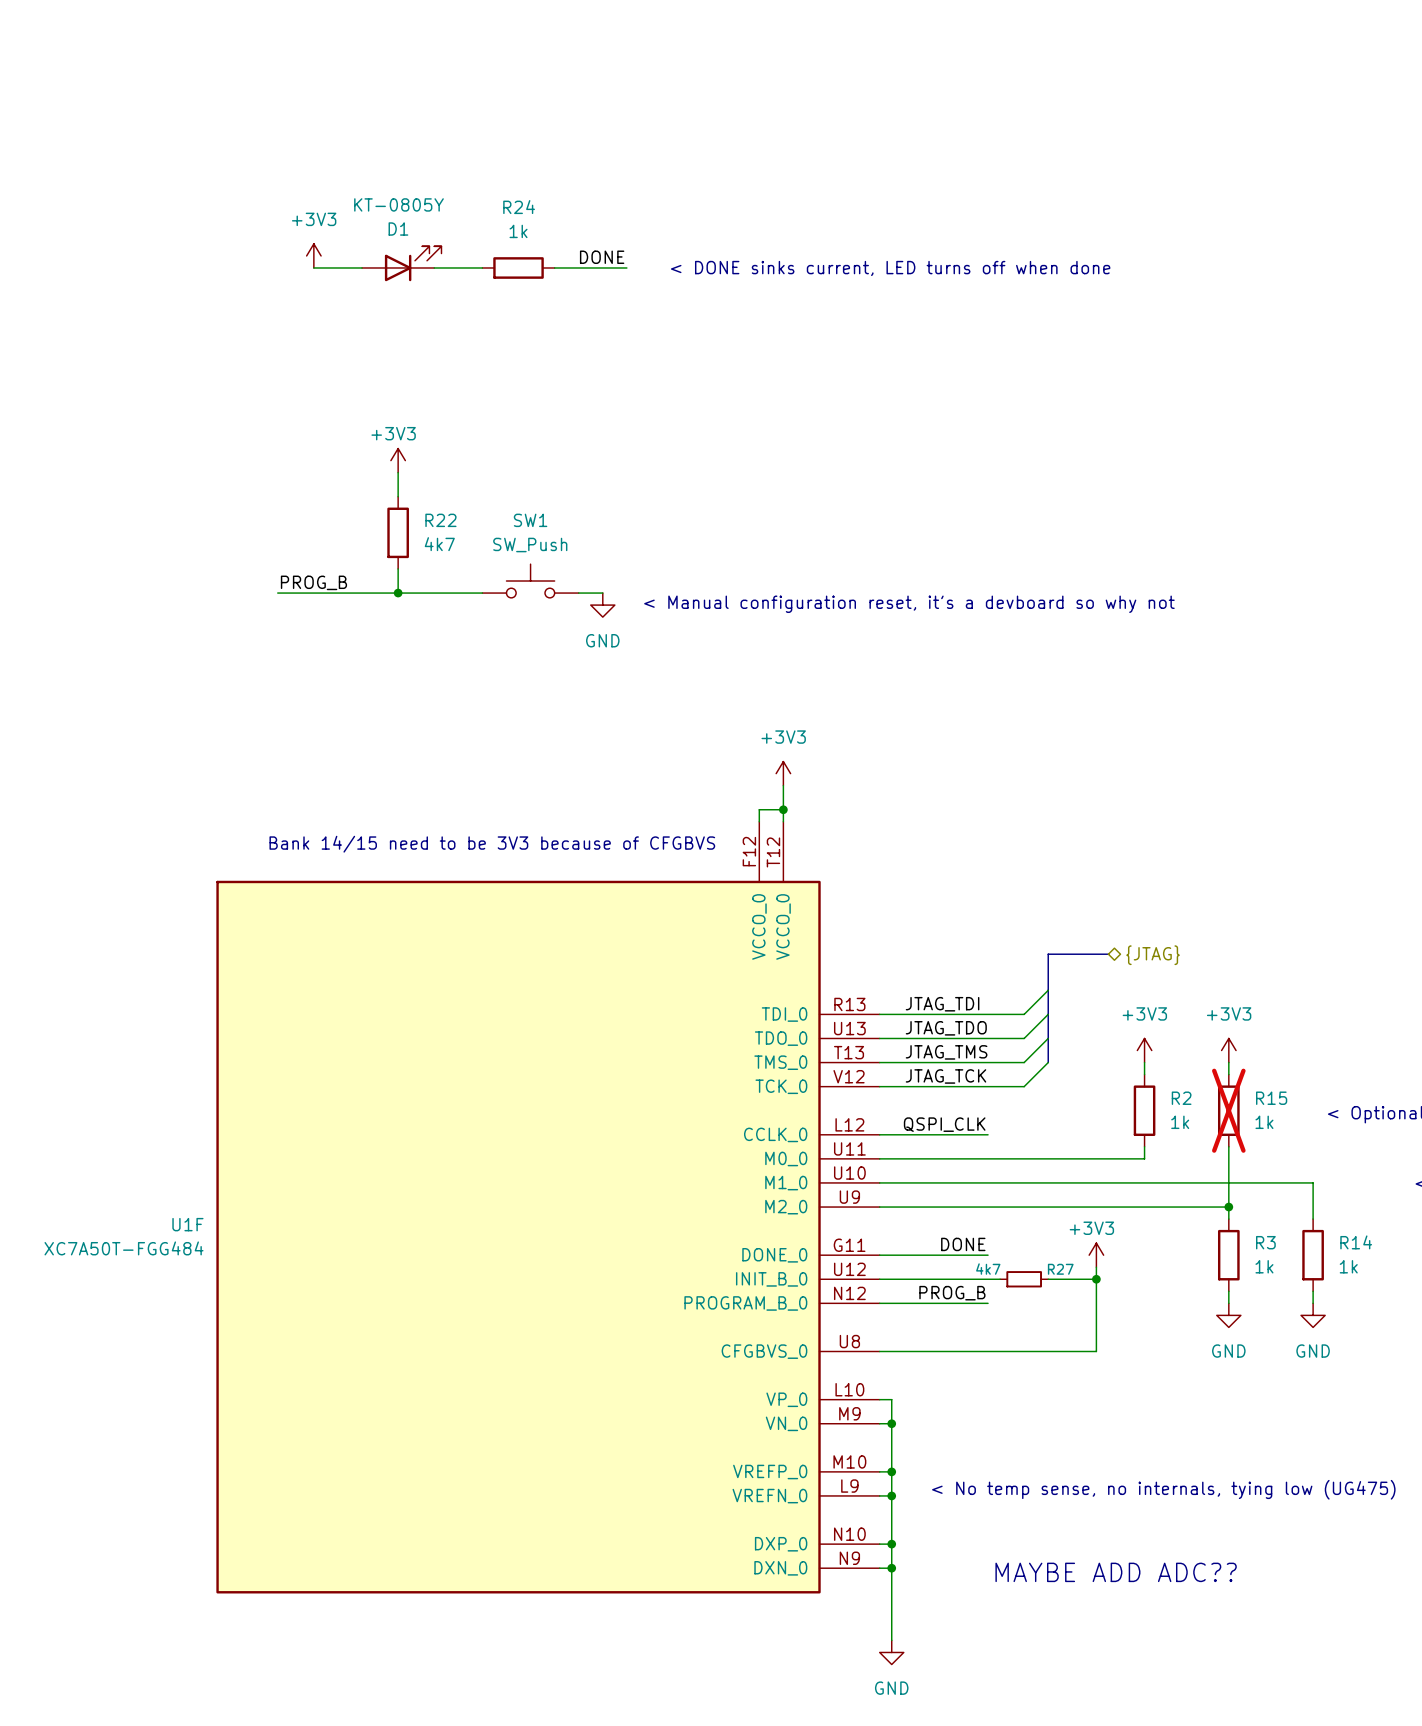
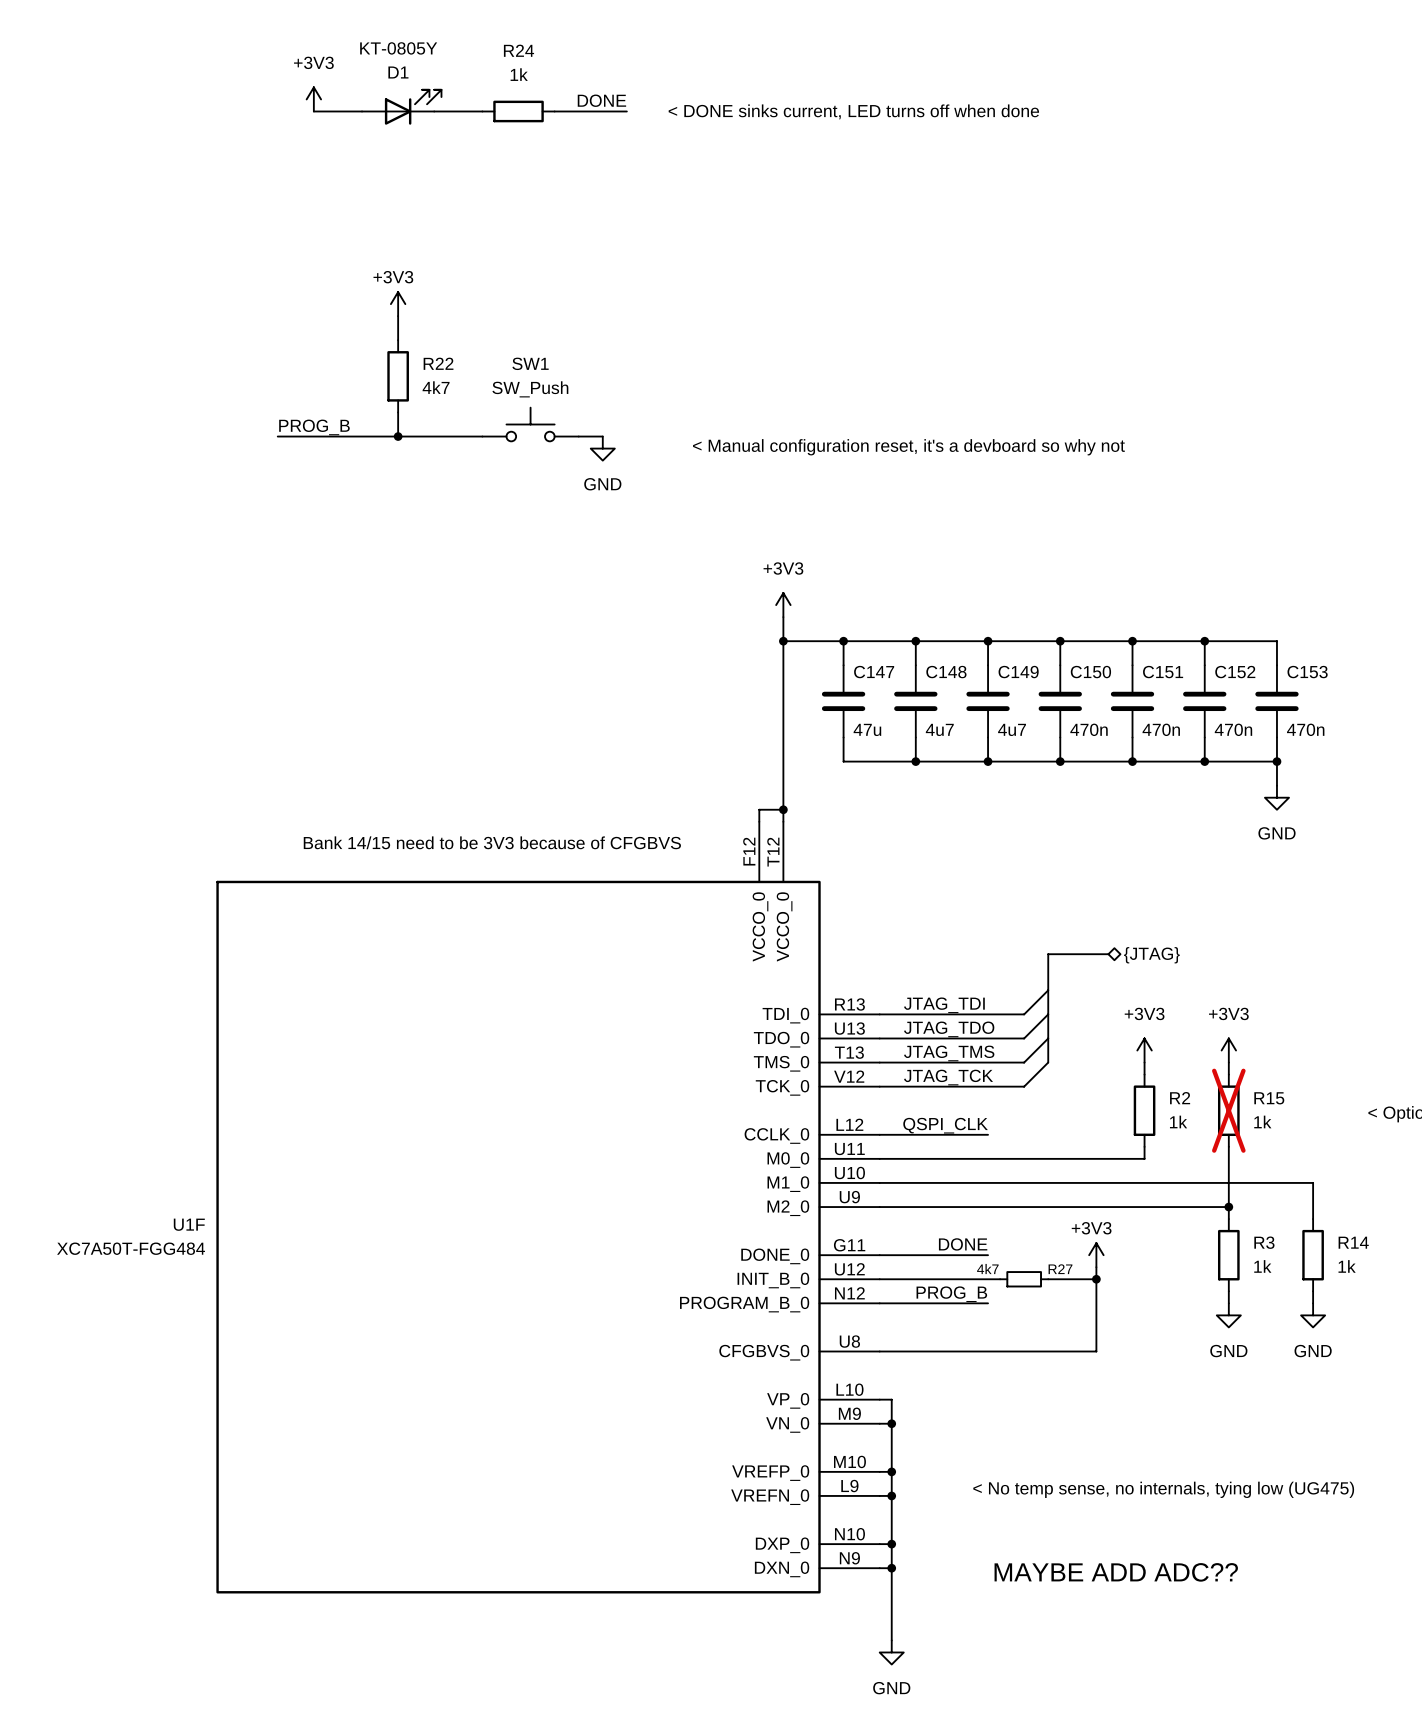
power symbol: none -> +3V3 (313, 99)
power symbol: +3V3 (313, 255) -> none
label position: DONE (602, 257) -> DONE (601, 100)
D1 position: (401, 263) -> (401, 107)
wire: (313, 267) (362, 267) -> (313, 111) (362, 111)
wire: (434, 267) (482, 267) -> (434, 111) (482, 111)
R24 position: (518, 267) -> (518, 111)
wire: (554, 267) (626, 267) -> (554, 111) (626, 111)
text position: < DONE sinks current, LED turns off when done (890, 268) -> < DONE sinks current, LED turns off when done (853, 111)
power symbol: none -> +3V3 (398, 304)
junction: none -> (398, 436)
power symbol: +3V3 (398, 460) -> none
wire: (398, 472) (398, 496) -> (398, 316) (398, 340)
R22 position: (398, 532) -> (398, 376)
wire: (398, 568) (398, 593) -> (398, 412) (398, 436)
SW1 position: (530, 581) -> (530, 424)
label position: PROG_B (313, 582) -> PROG_B (314, 427)
wire: (277, 593) (482, 593) -> (277, 436) (482, 436)
junction: (398, 593) -> none
wire: (578, 593) (602, 593) -> (578, 436) (602, 436)
text position: < Manual configuration reset, it's a devboard so why not (909, 604) -> < Manual configuration reset, it's a devboard so why not (908, 447)
power symbol position: GND (602, 605) -> GND (602, 448)
wire: none -> (783, 617) (783, 785)
wire: none -> (783, 641) (1276, 641) (1276, 665)
junction: none -> (783, 641)
wire: none -> (843, 641) (843, 665)
junction: none -> (843, 641)
wire: none -> (915, 641) (915, 665)
junction: none -> (915, 641)
wire: none -> (988, 641) (988, 665)
junction: none -> (988, 641)
wire: none -> (1060, 641) (1060, 665)
junction: none -> (1060, 641)
wire: none -> (1132, 641) (1132, 665)
junction: none -> (1132, 641)
wire: none -> (1204, 641) (1204, 665)
junction: none -> (1204, 641)
C147: none -> 47u (843, 701)
C148: none -> 4u7 (915, 701)
C149: none -> 4u7 (988, 701)
C150: none -> 470n (1060, 701)
C151: none -> 470n (1132, 701)
C152: none -> 470n (1204, 701)
C153: none -> 470n (1276, 701)
wire: none -> (843, 737) (843, 761) (1276, 761)
wire: none -> (915, 737) (915, 761)
wire: none -> (988, 737) (988, 761)
wire: none -> (1060, 737) (1060, 761)
wire: none -> (1132, 737) (1132, 761)
wire: none -> (1204, 737) (1204, 761)
wire: none -> (1276, 737) (1276, 785)
junction: none -> (915, 761)
junction: none -> (988, 761)
junction: none -> (1060, 761)
junction: none -> (1132, 761)
junction: none -> (1204, 761)
junction: none -> (1276, 761)
power symbol position: +3V3 (783, 773) -> +3V3 (783, 605)
power symbol: none -> GND (1276, 797)

